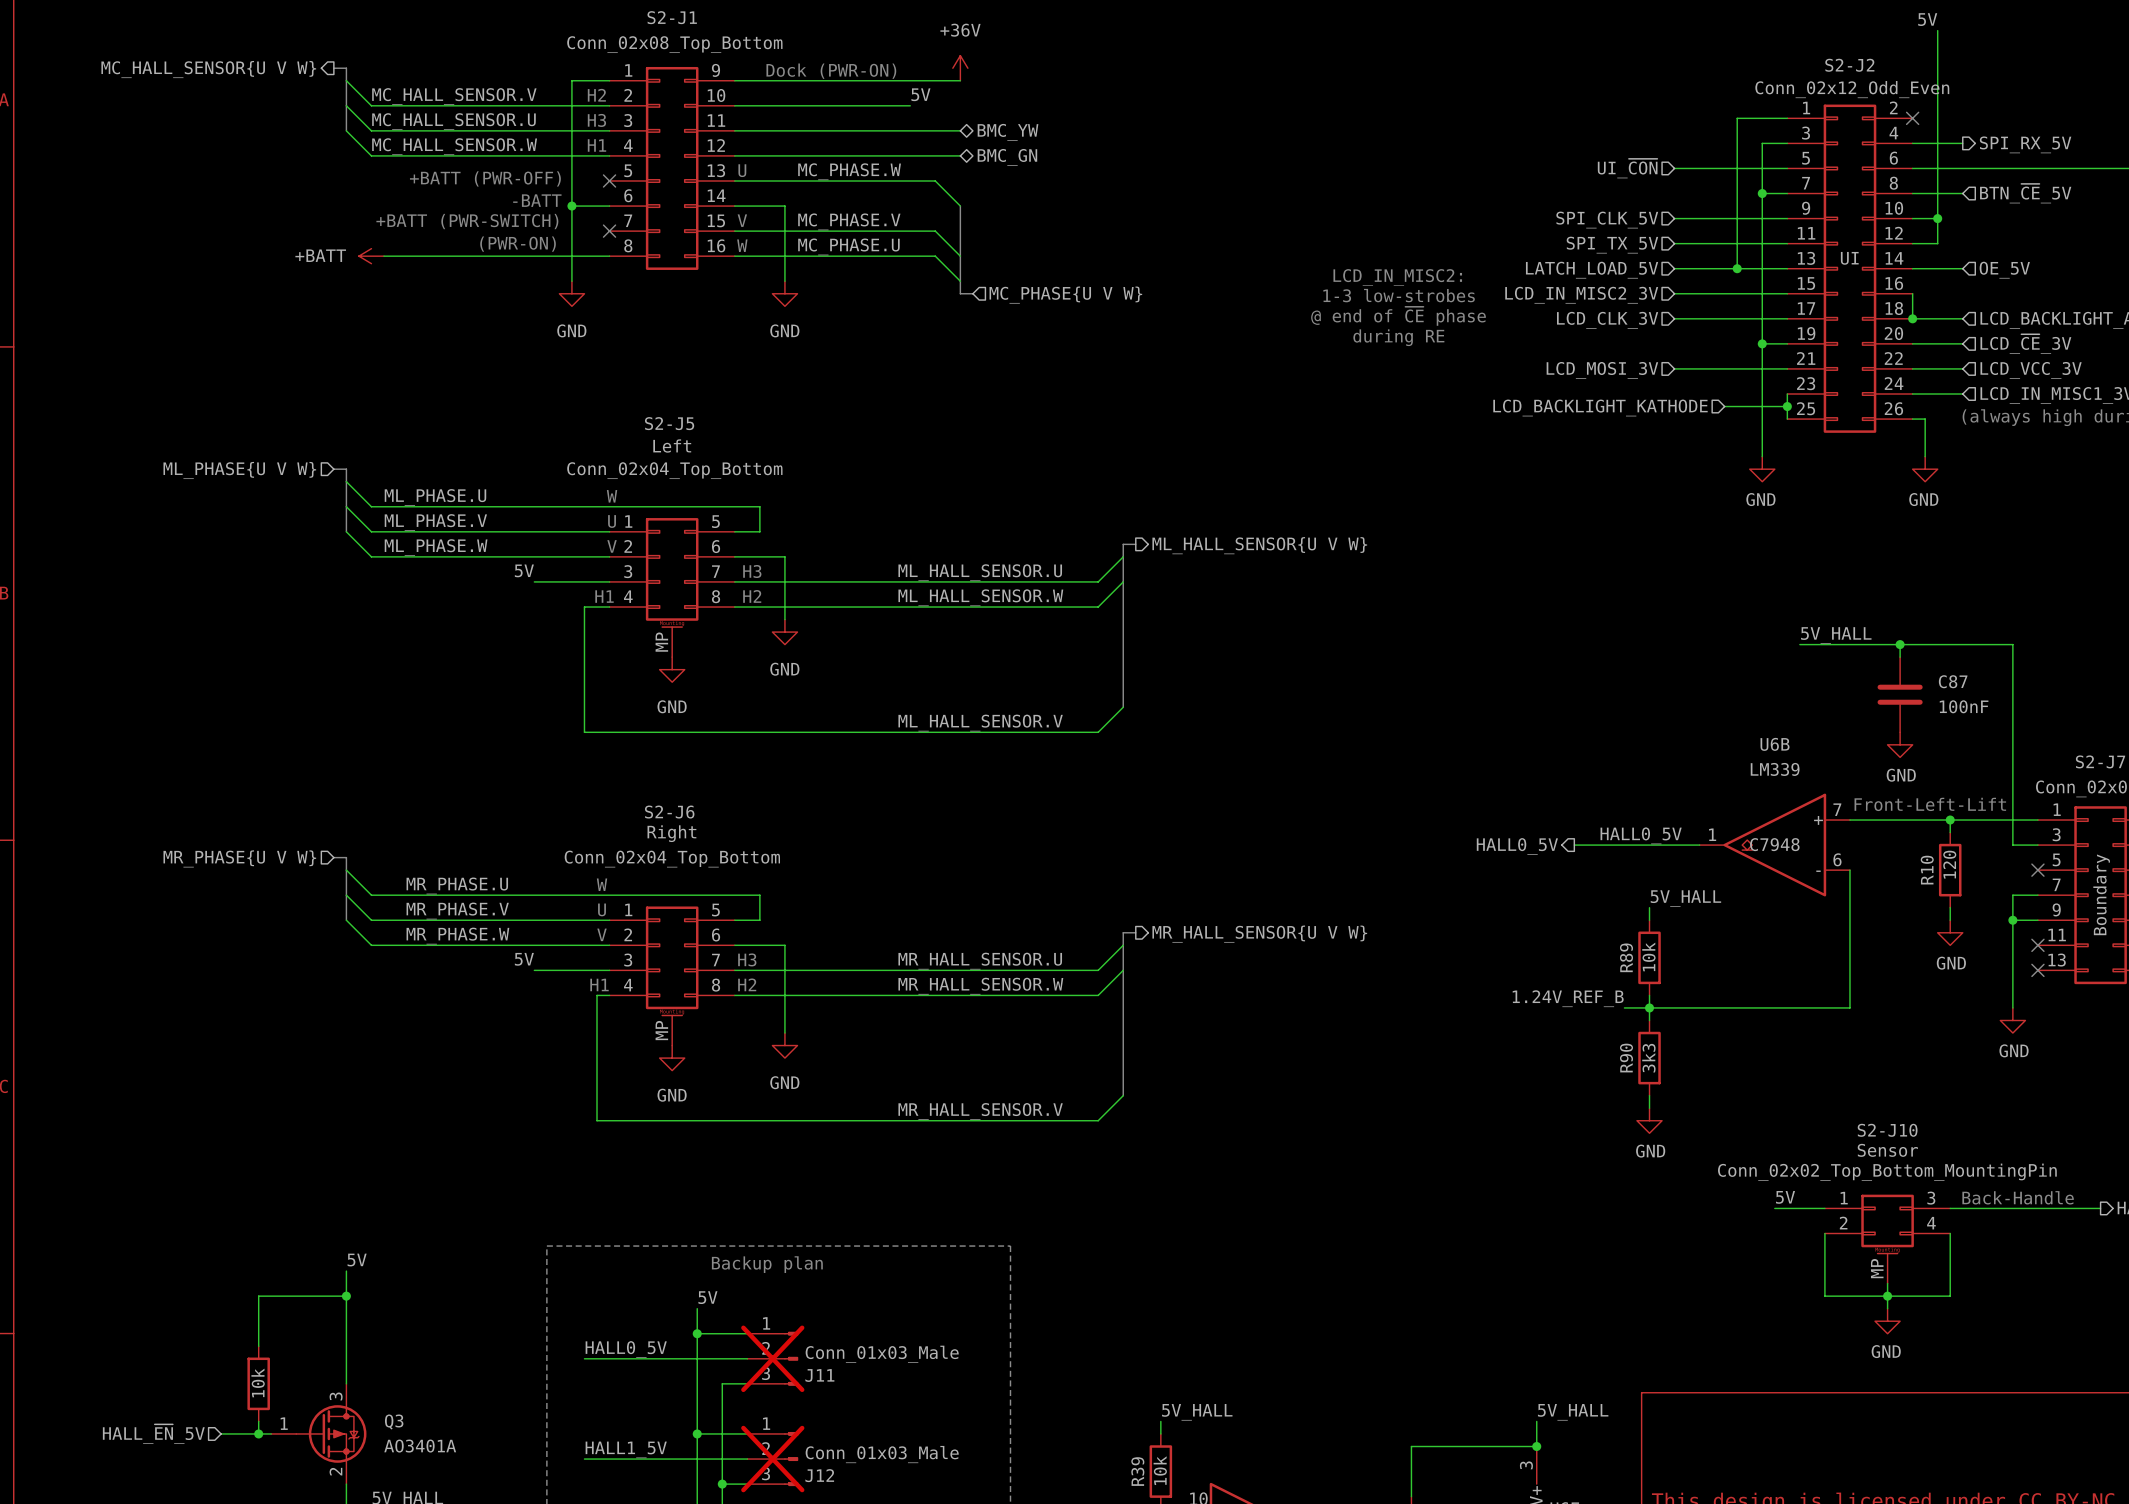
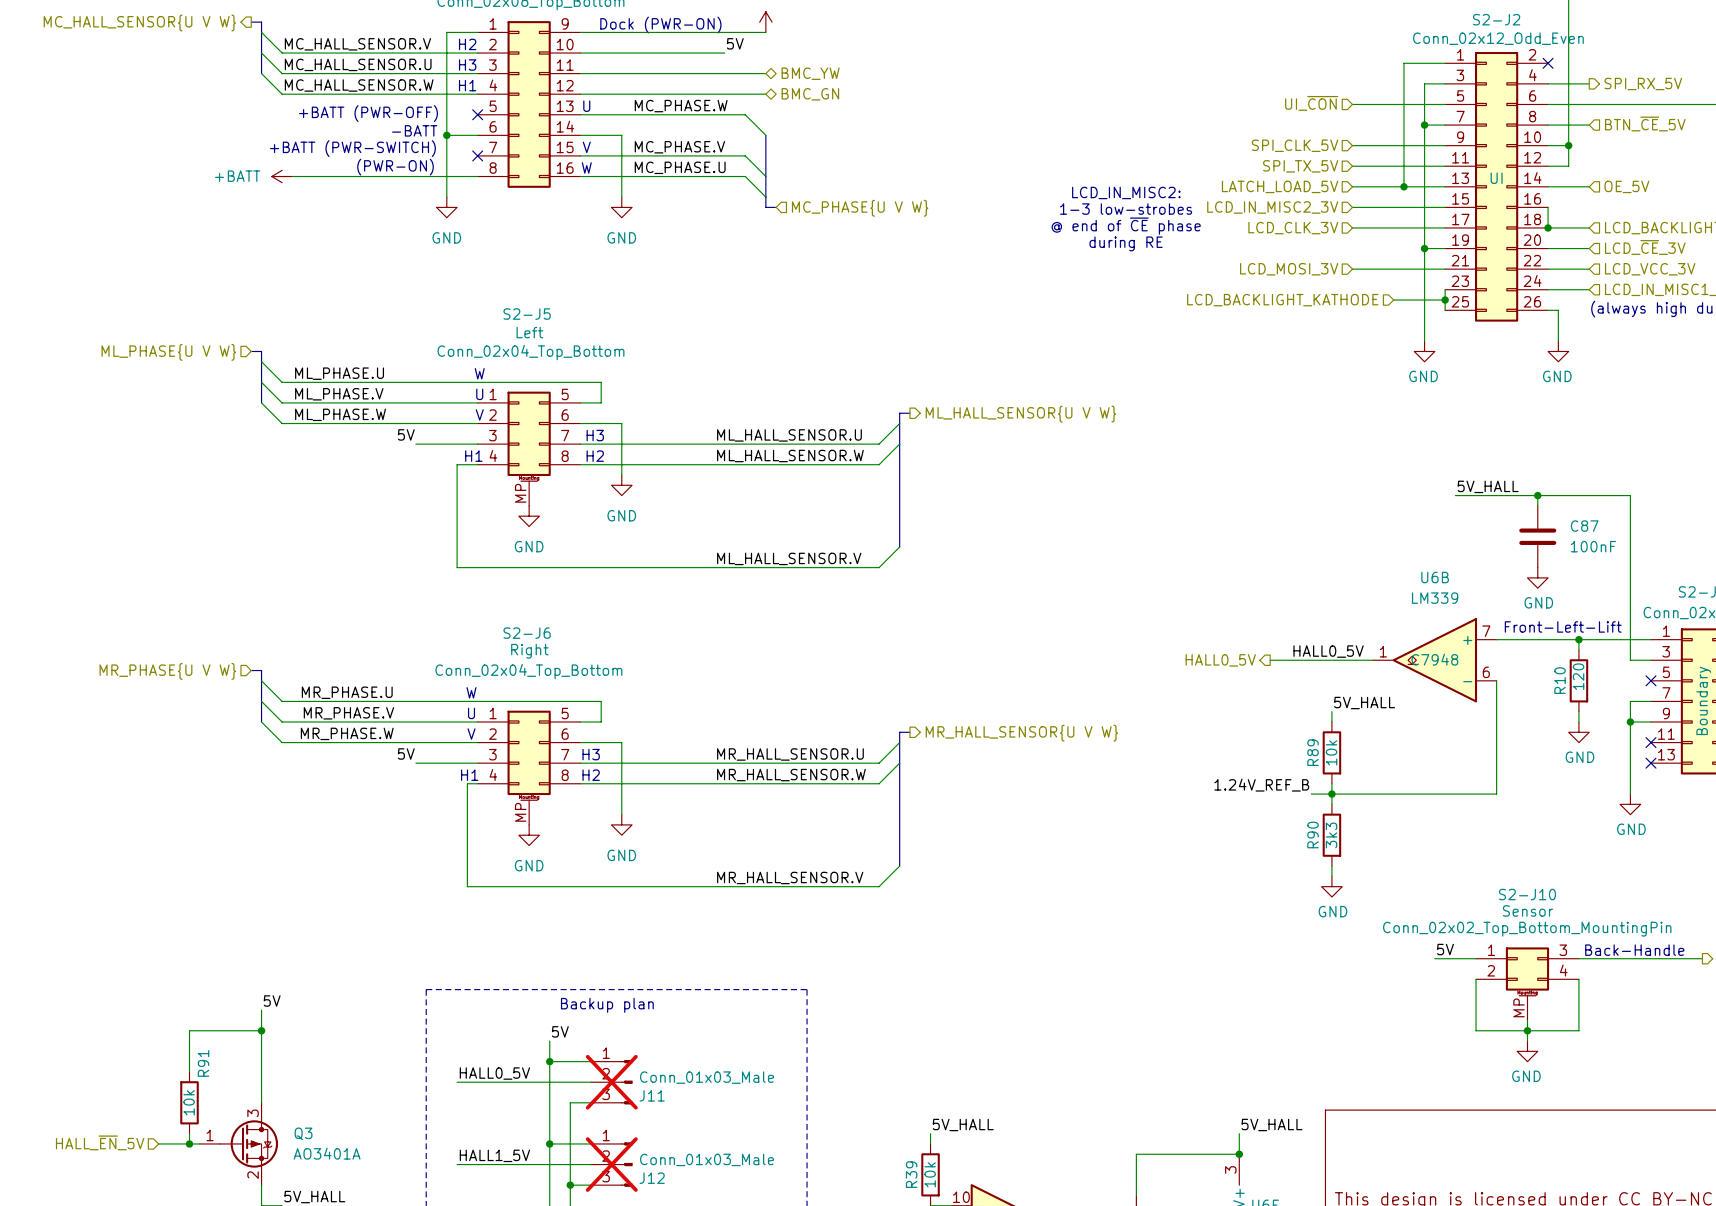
R91 name: none -> R91 (203, 1063)

